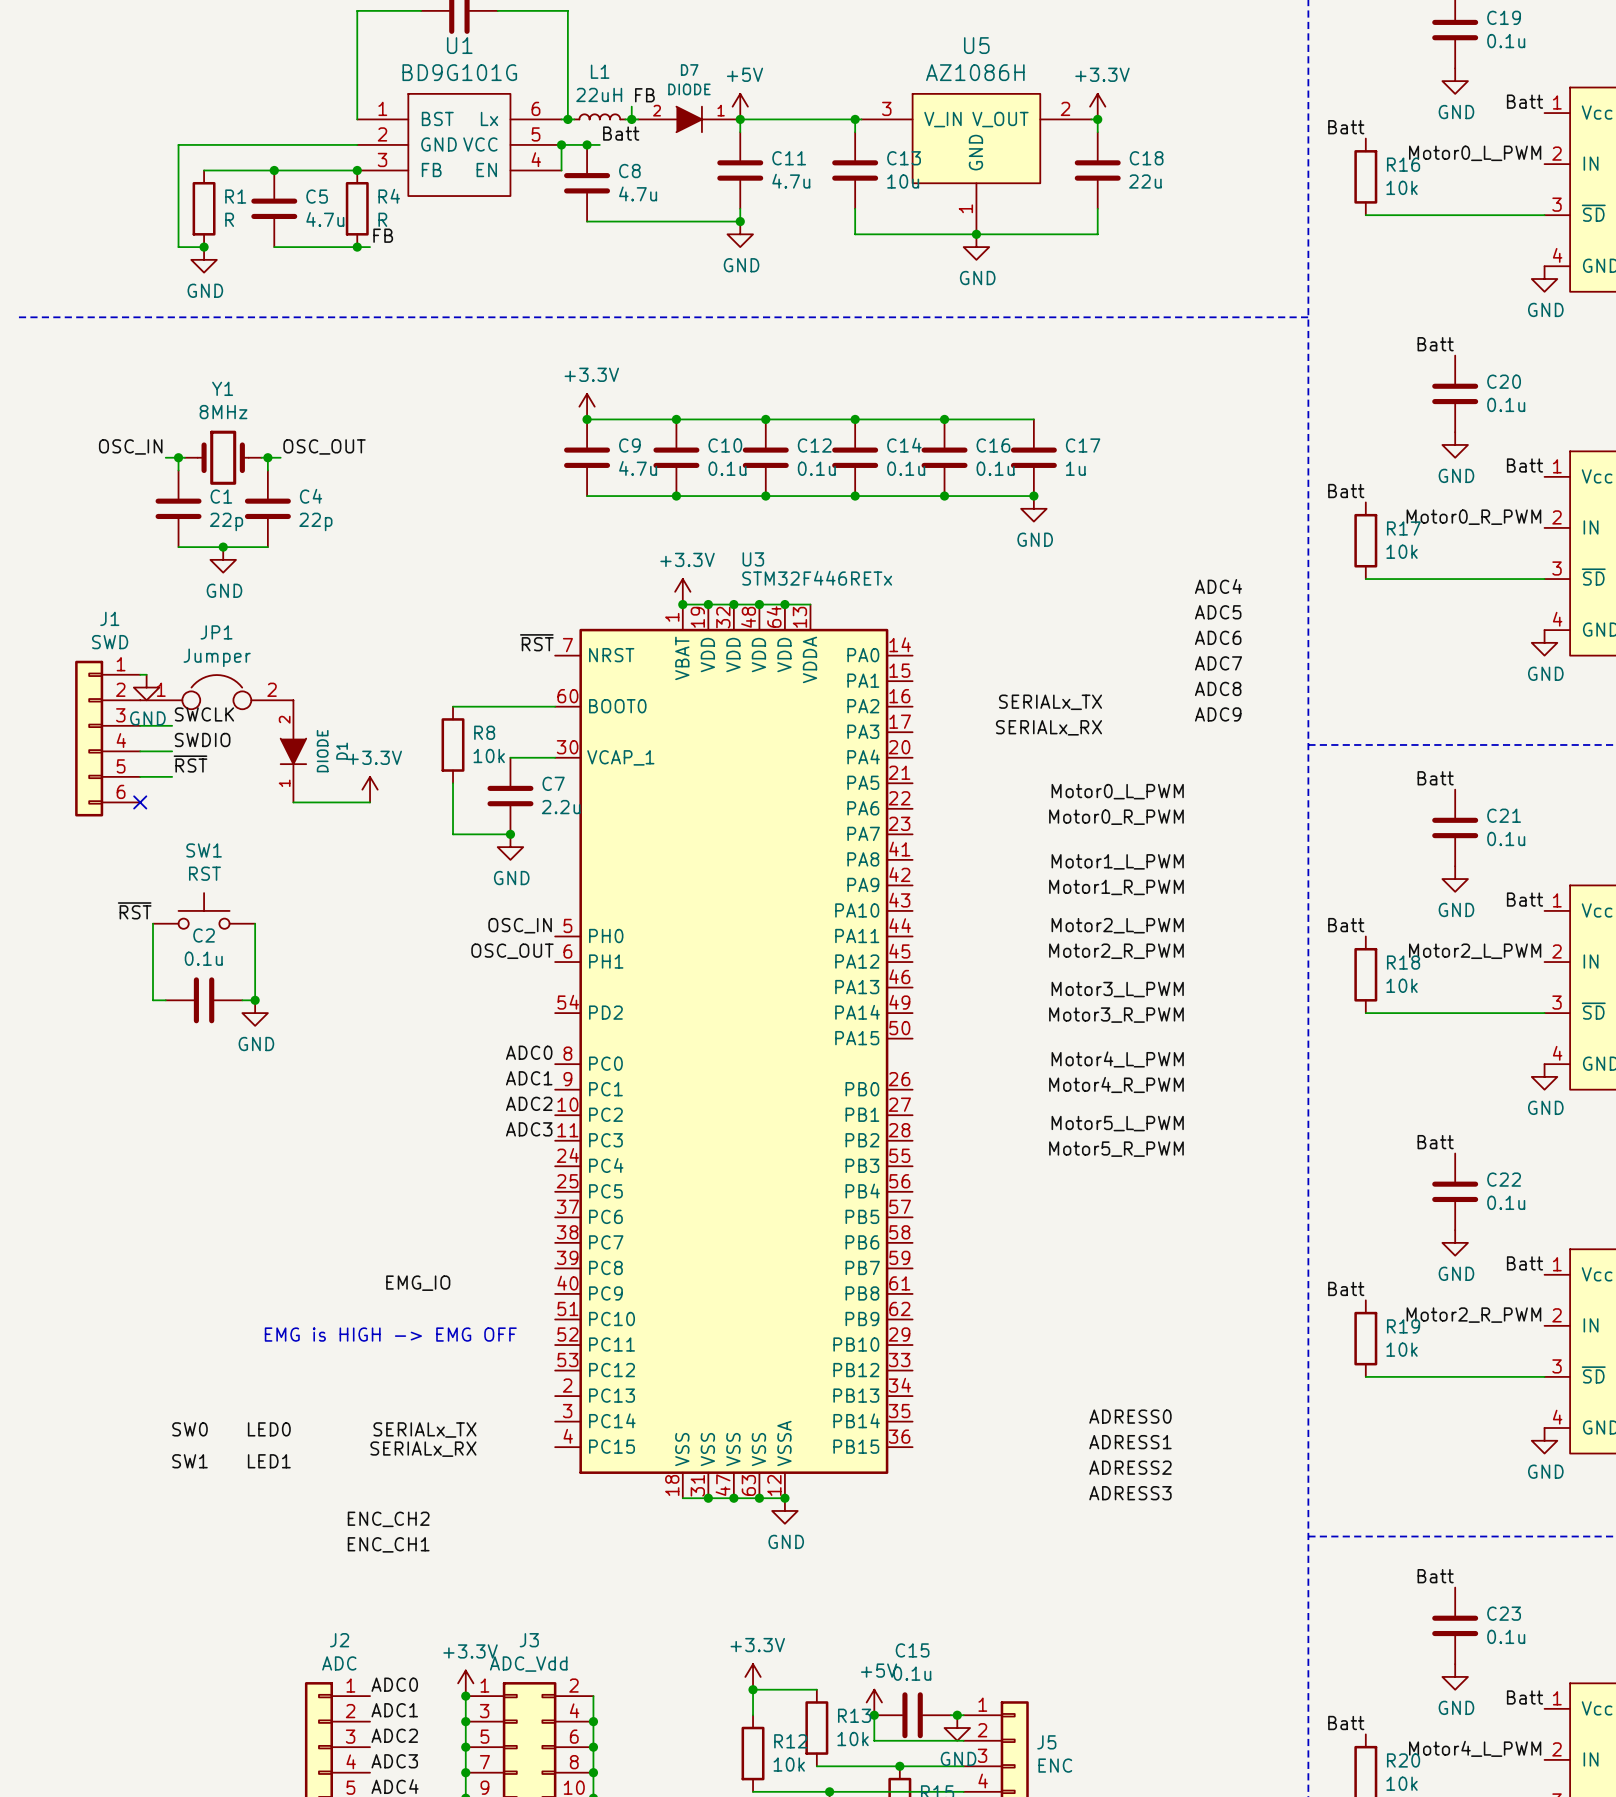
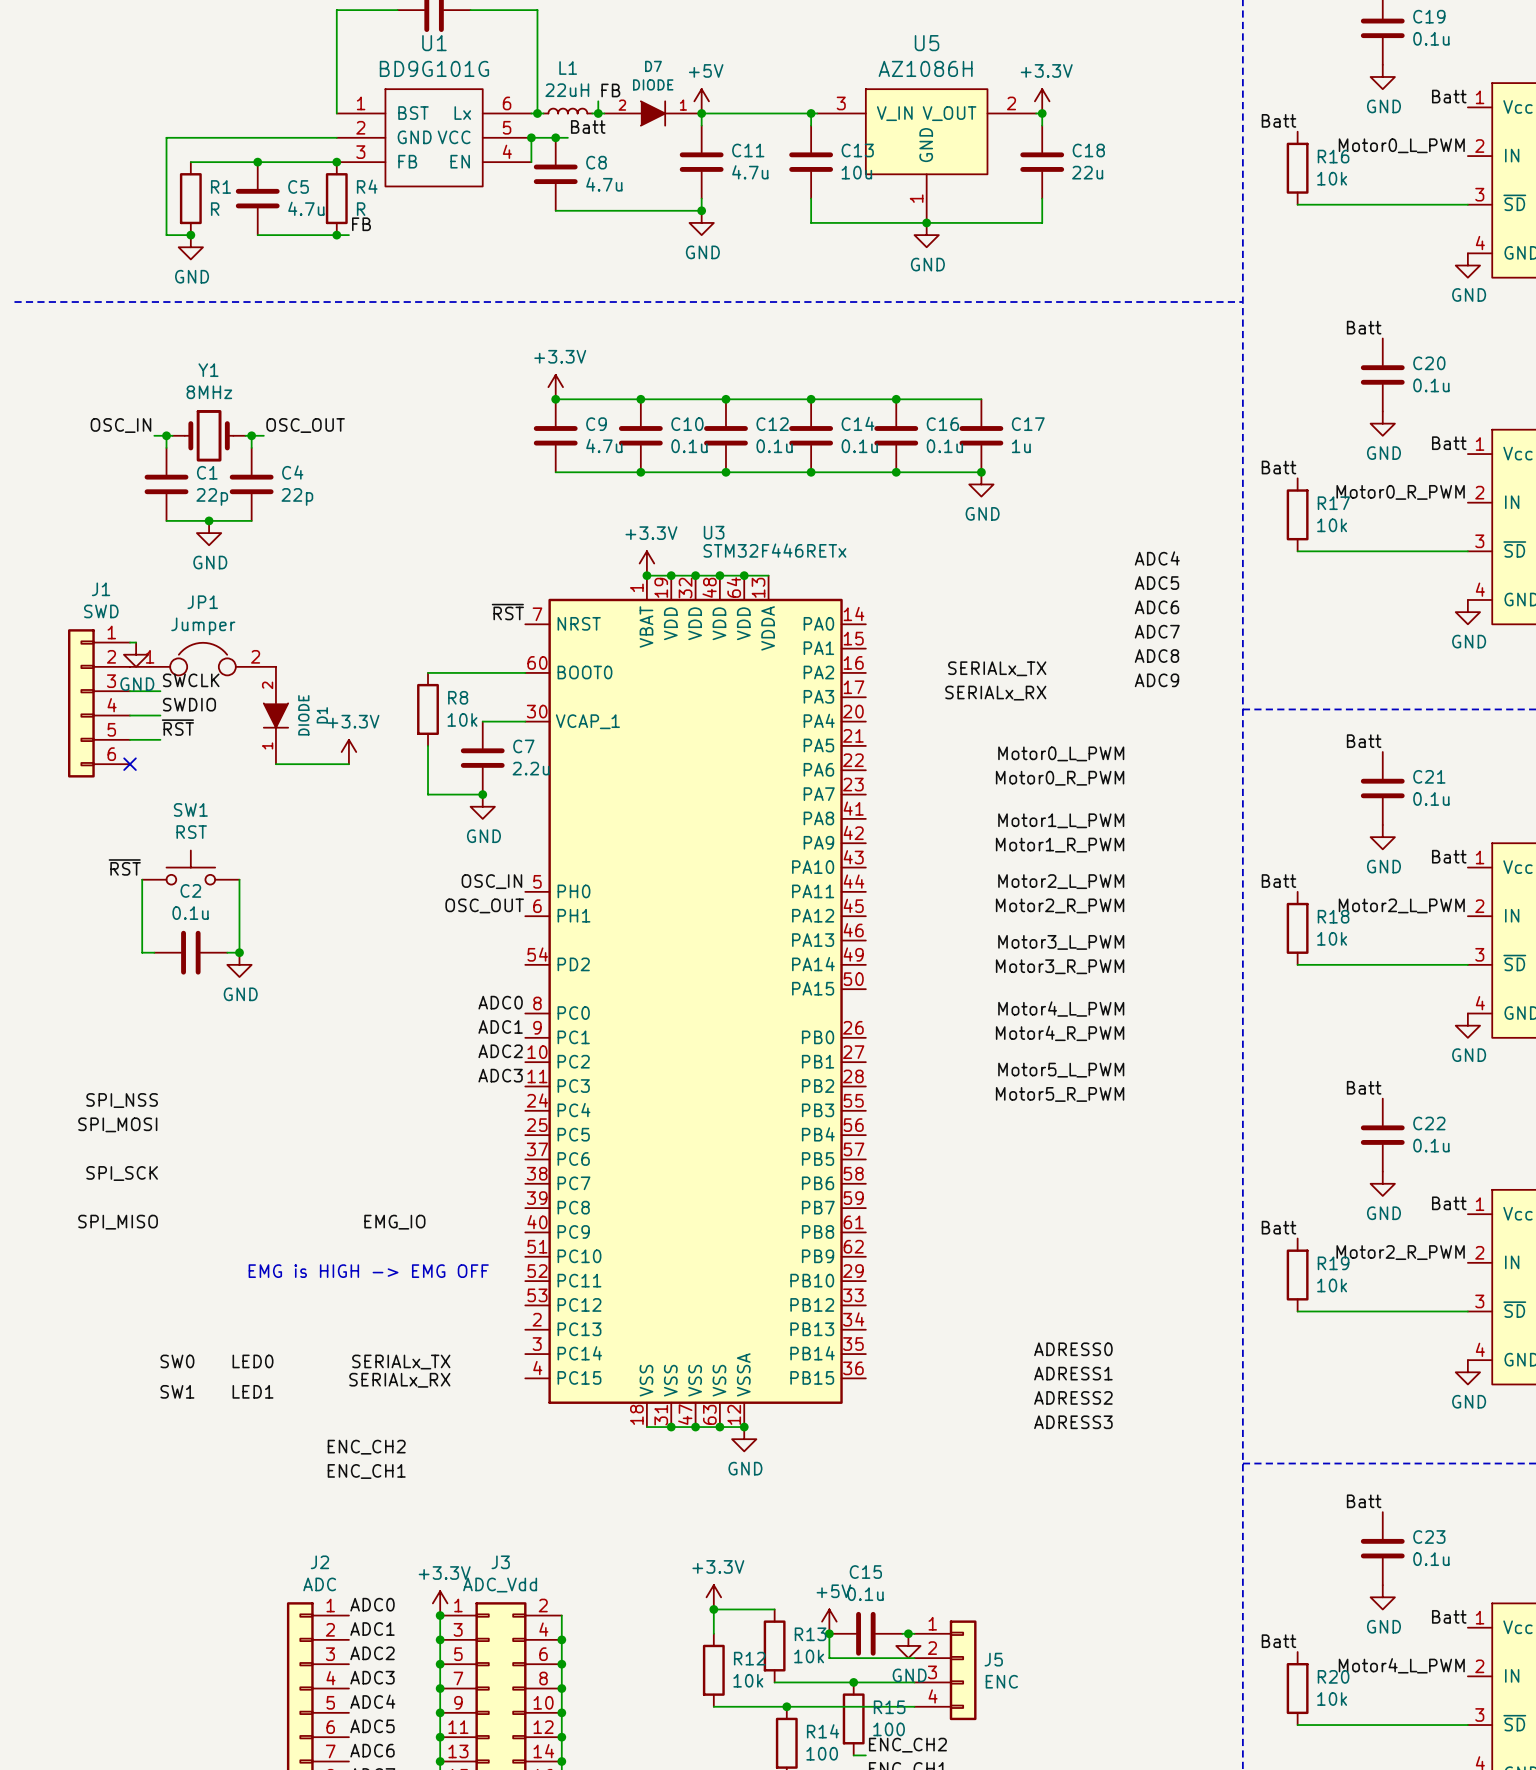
label: none -> SPI_NSS (122, 1100)
label: none -> SPI_MOSI (117, 1124)
label: none -> SPI_SCK (122, 1173)
label: none -> SPI_MISO (118, 1222)

